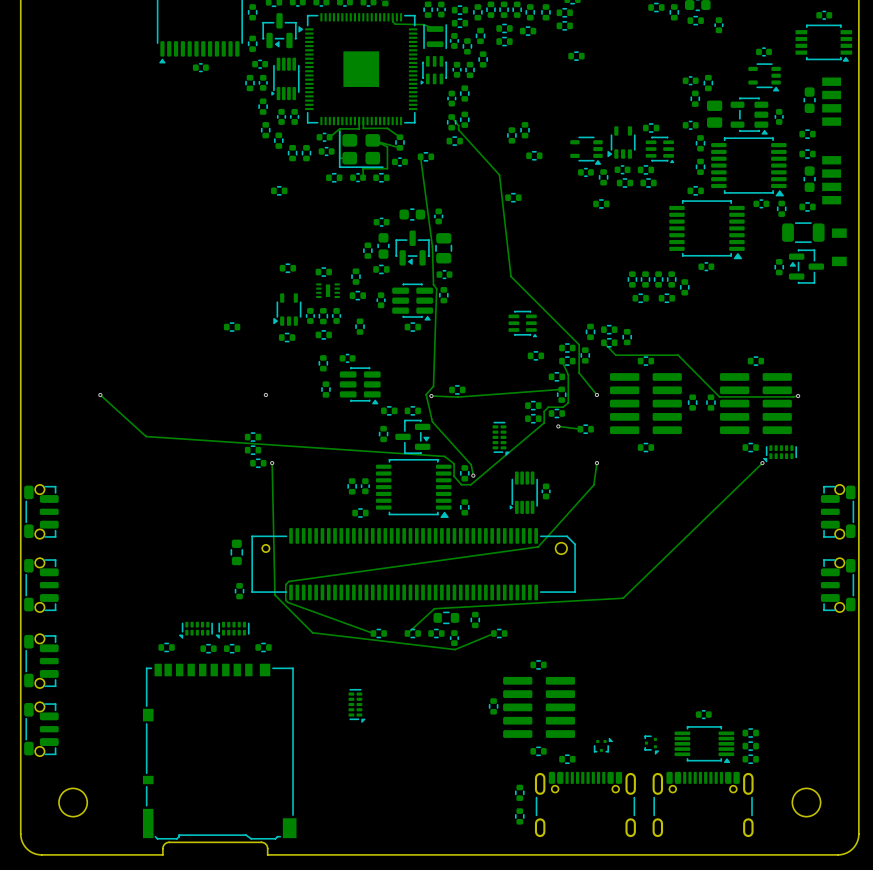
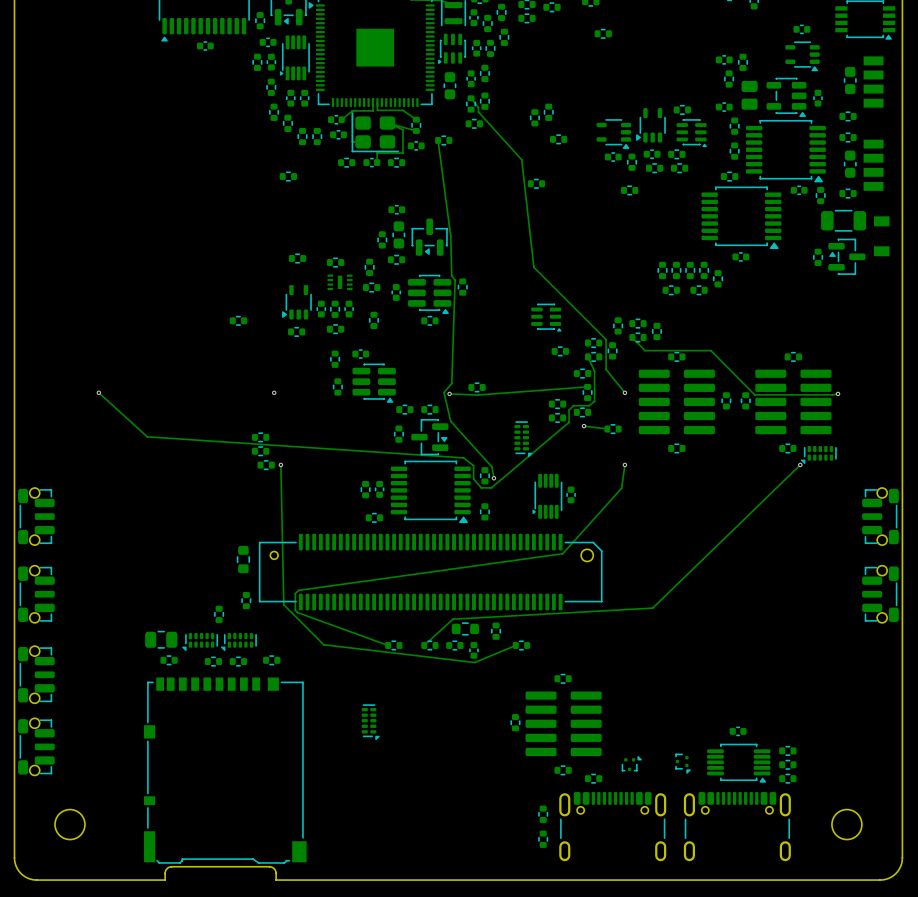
part rotation: 0° (412, 214) -> 90° clockwise (449, 85)
part position: (412, 214) -> (449, 85)
part: (438, 216) -> none
part: (443, 248) -> none
part: (444, 274) -> none
part: none -> (219, 614)
part: none -> (161, 639)

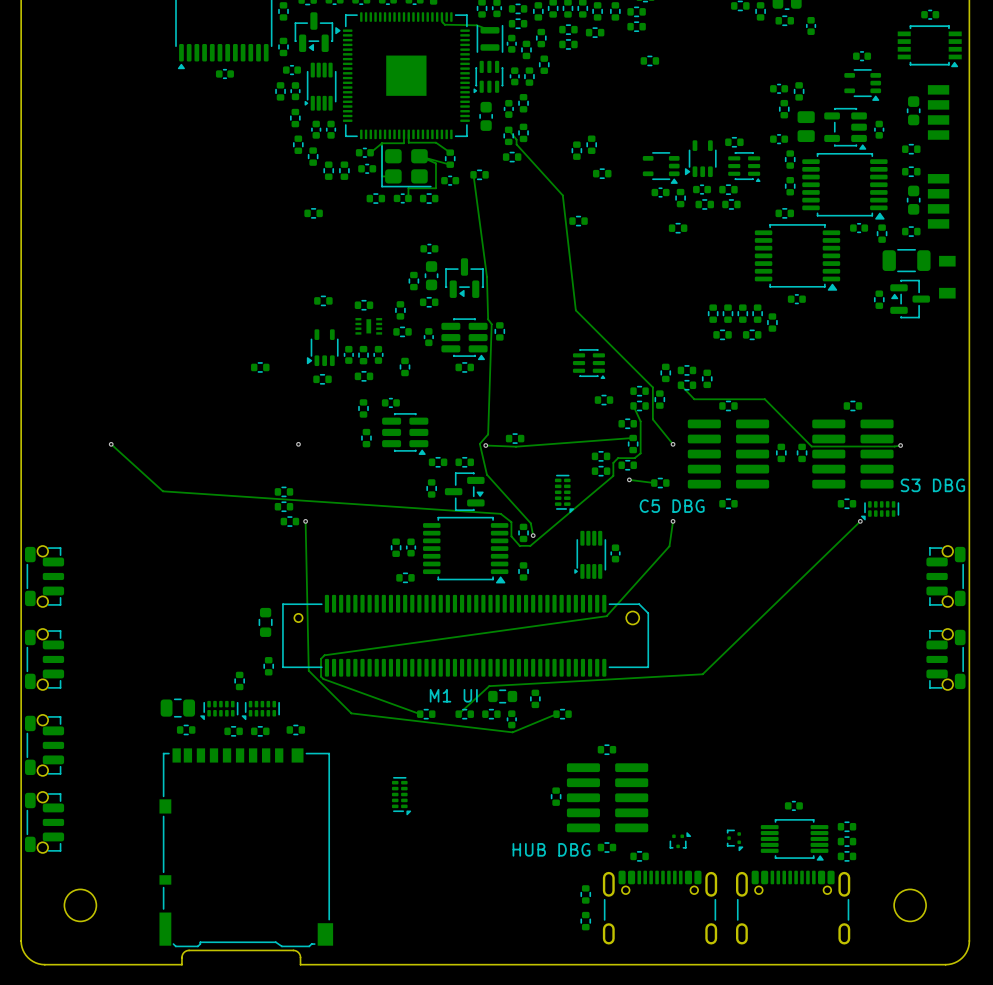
text: none -> S3 DBG (932, 485)
text: none -> C5 DBG (672, 506)
text: none -> M1 UI (453, 695)
text: none -> HUB DBG (551, 849)

